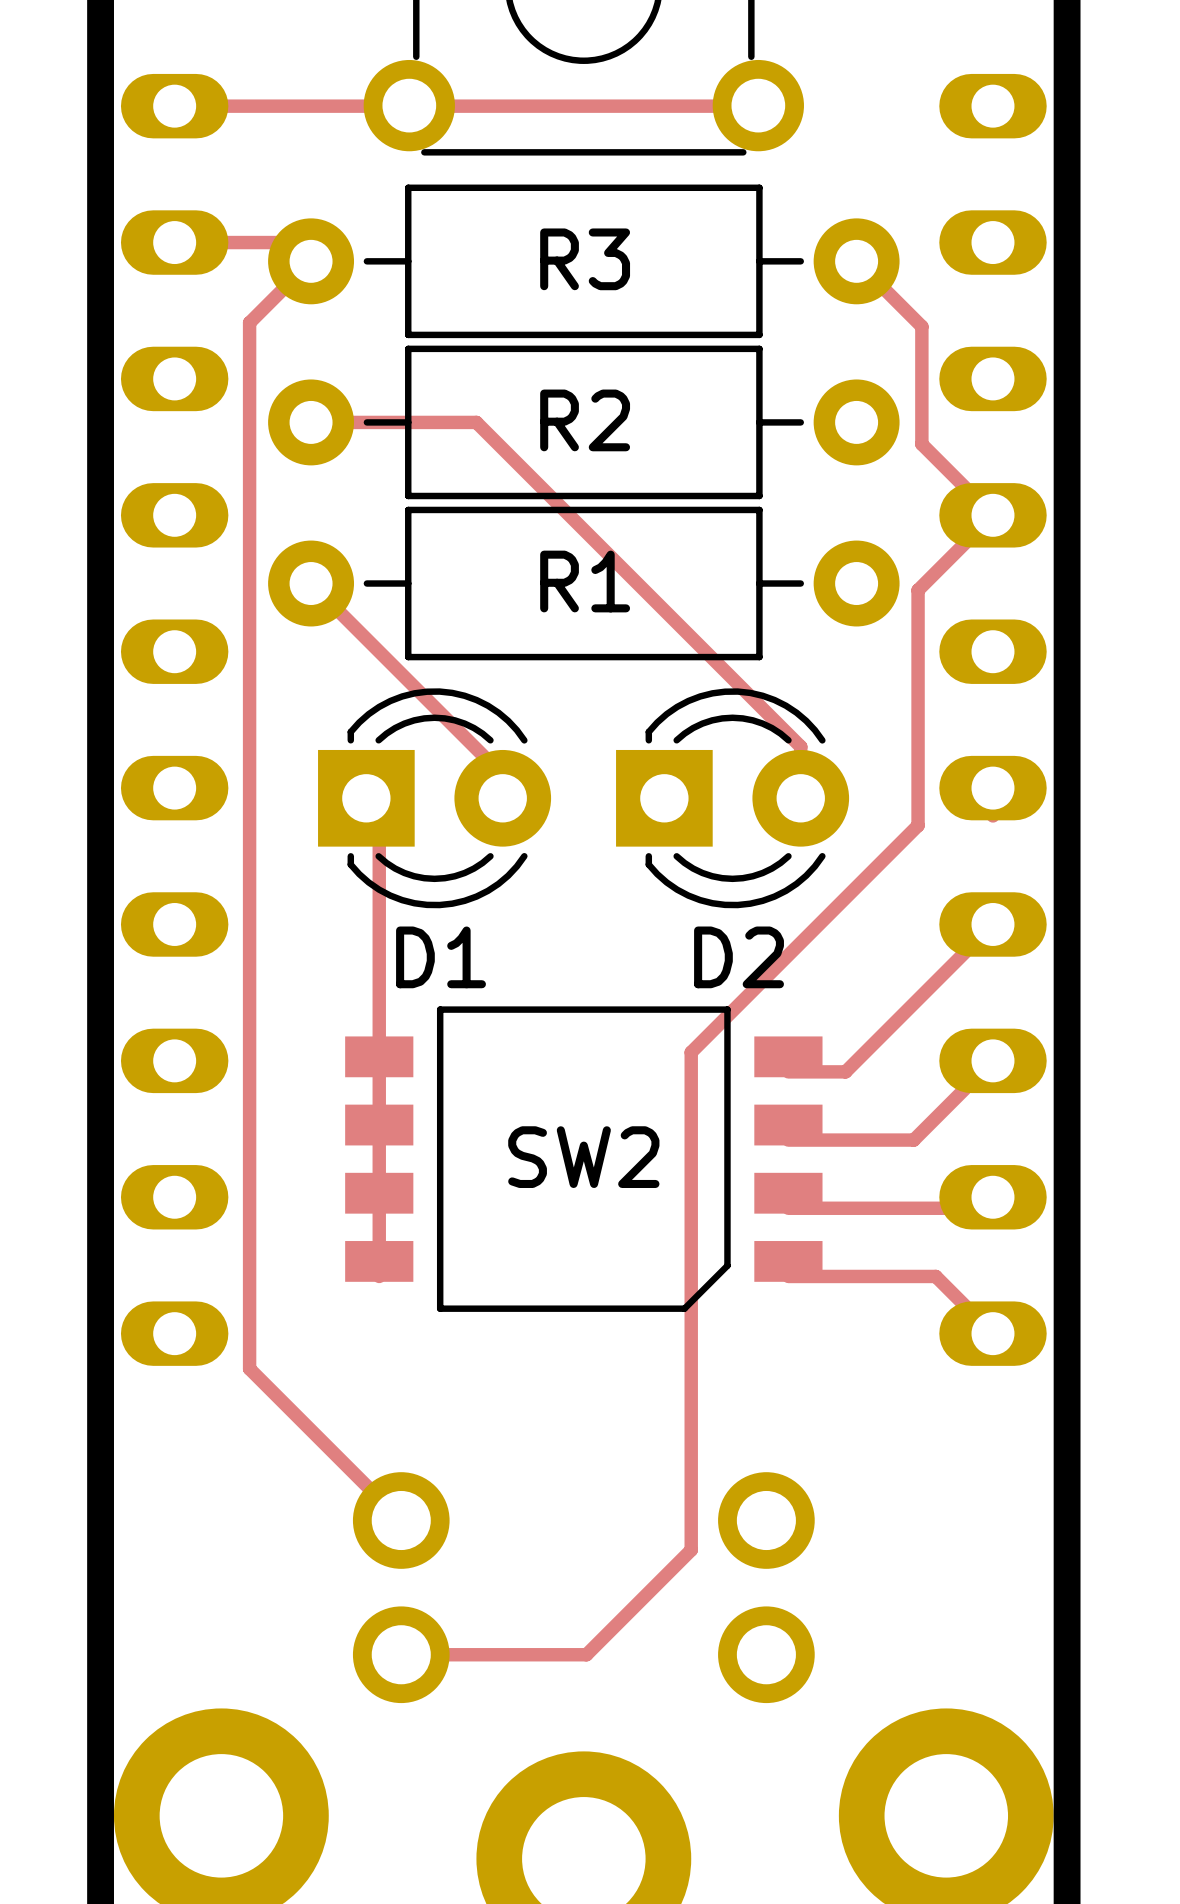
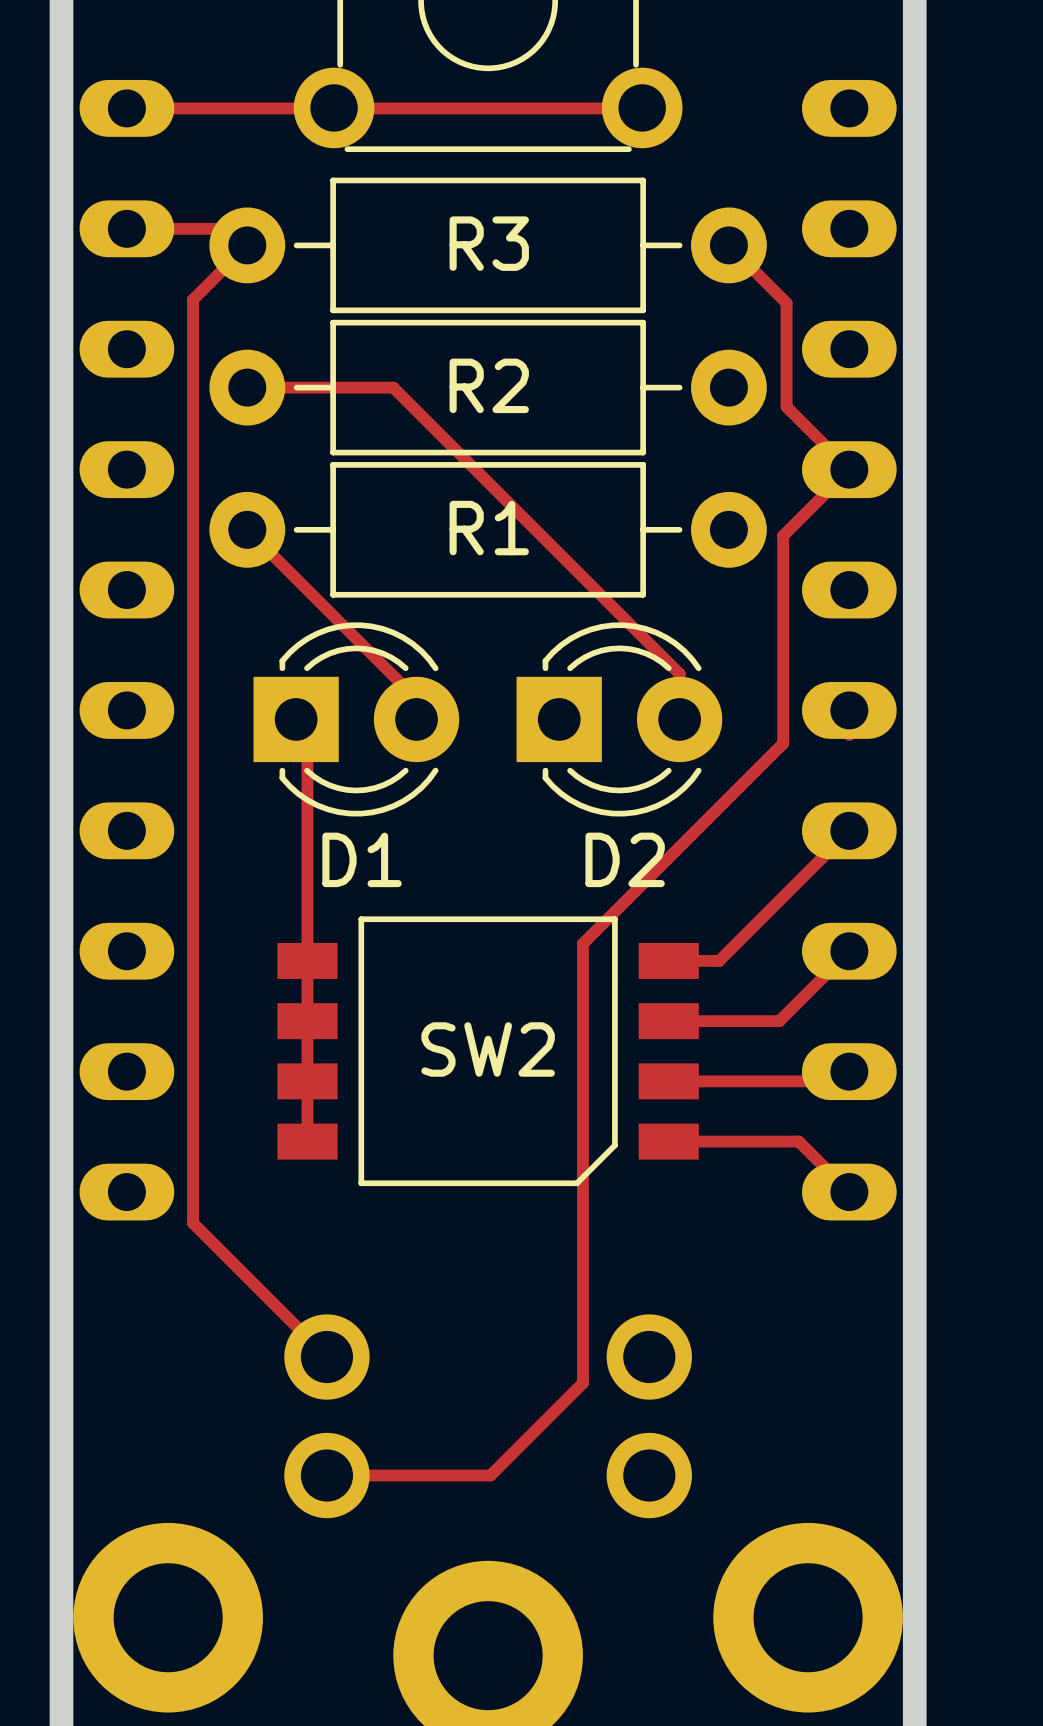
SW2 position: (583, 1159) -> (488, 1051)

